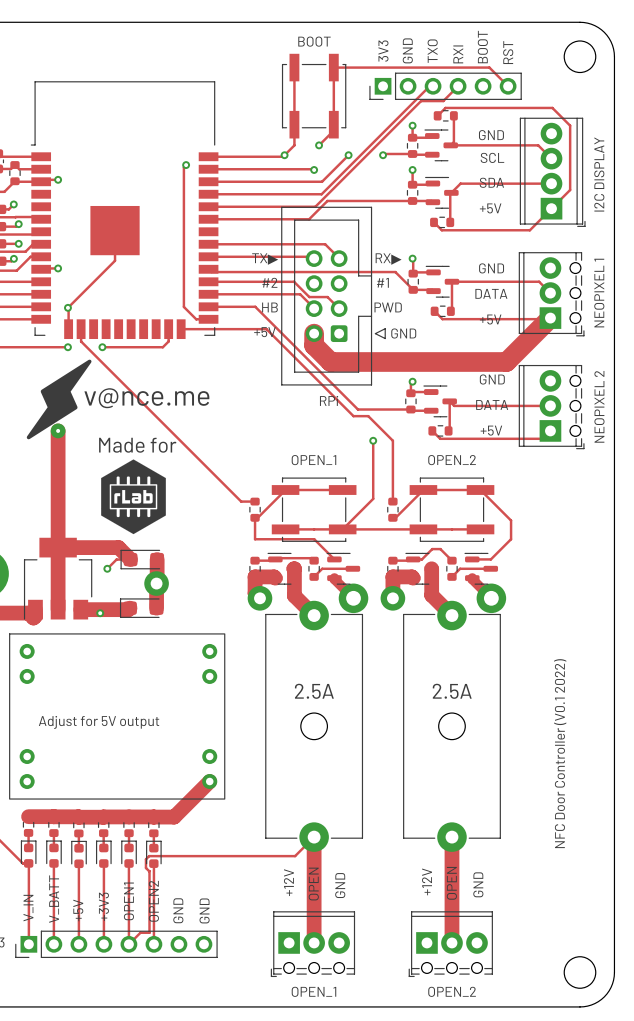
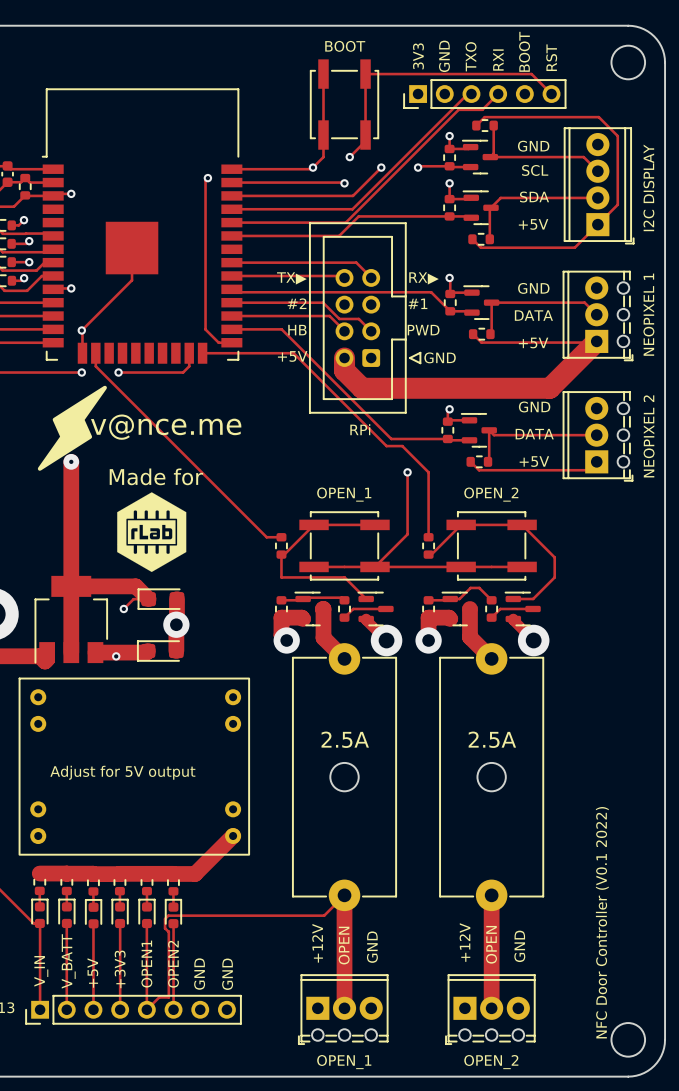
text position: NFC Door Controller (V0.1 2022) (560, 753) -> NFC Door Controller (V0.1 2022) (602, 922)

